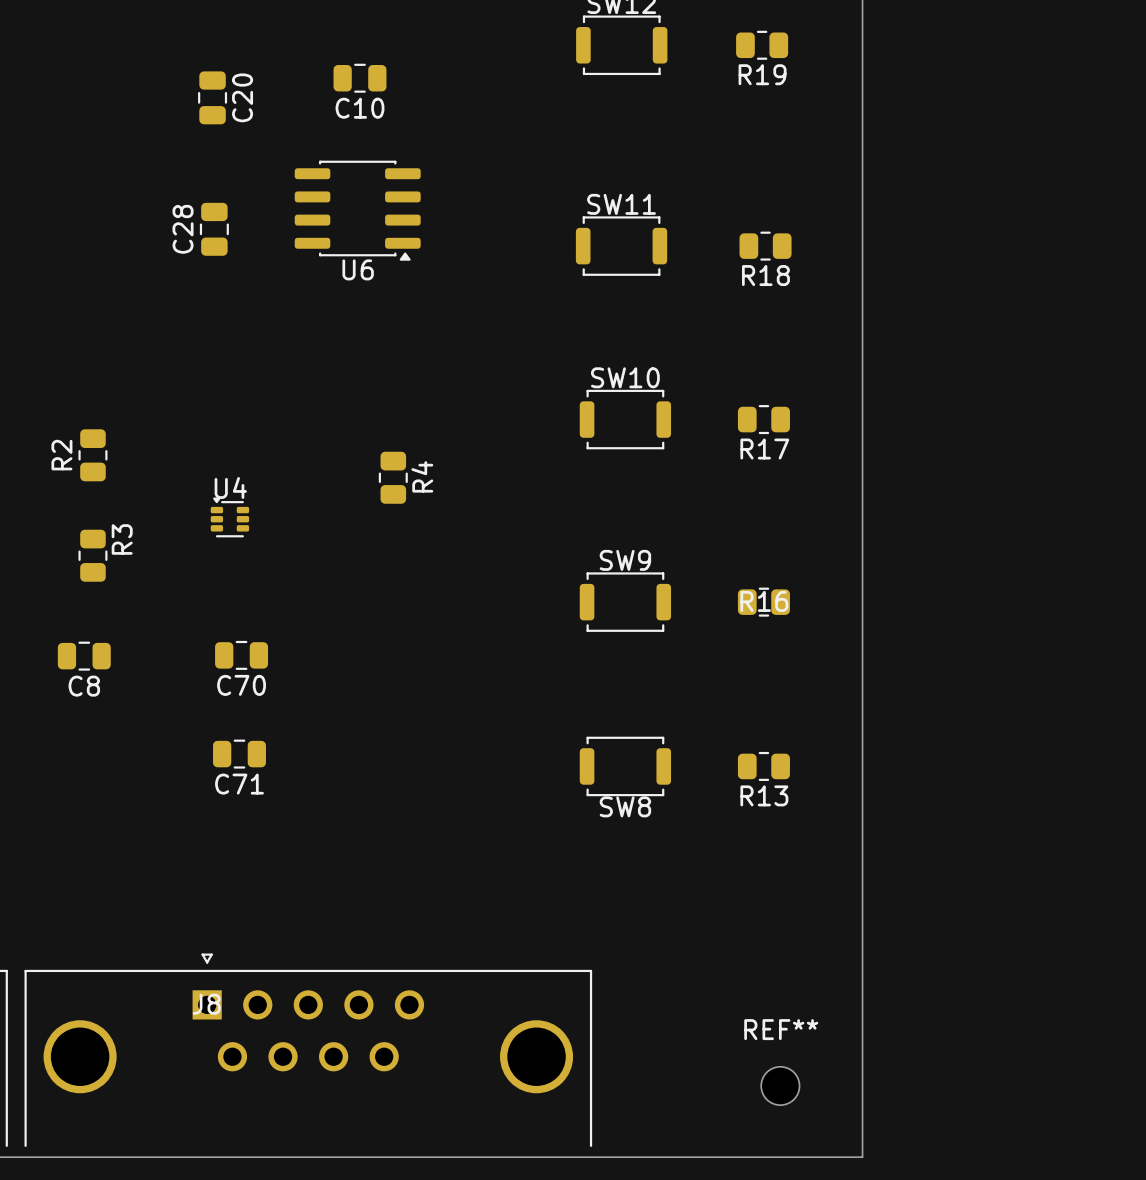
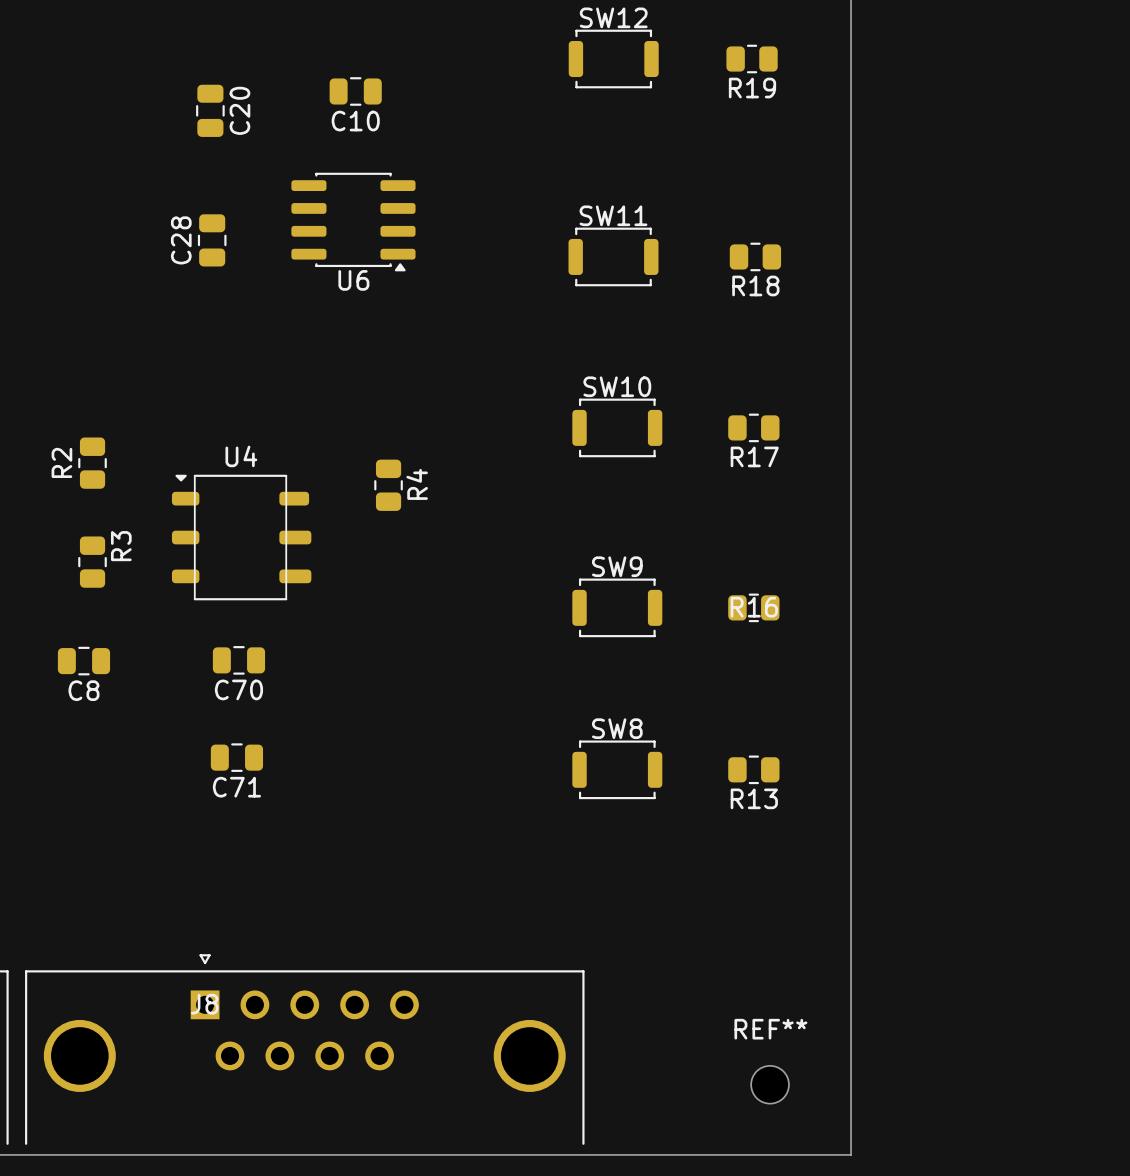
U4 name position: U4 (230, 487) -> U4 (241, 456)
U4 footprint: [210, 497, 250, 538] -> [171, 474, 312, 601]
SW8 name position: SW8 (625, 806) -> SW8 (617, 728)

